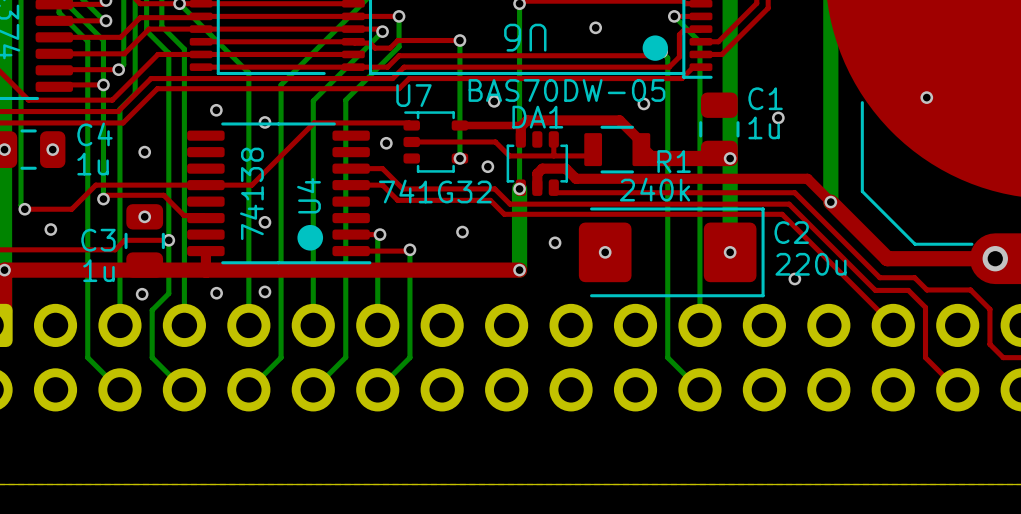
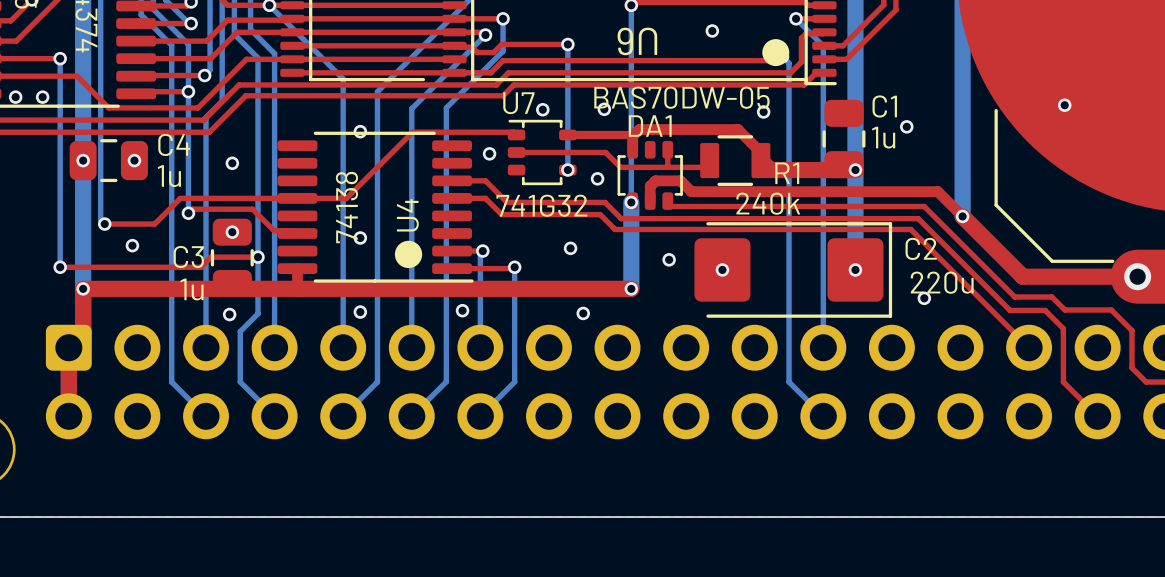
via: none -> (542, 109)
via: (216, 110) -> none
via: none -> (462, 310)
via: (216, 293) -> none
via: none -> (583, 313)

